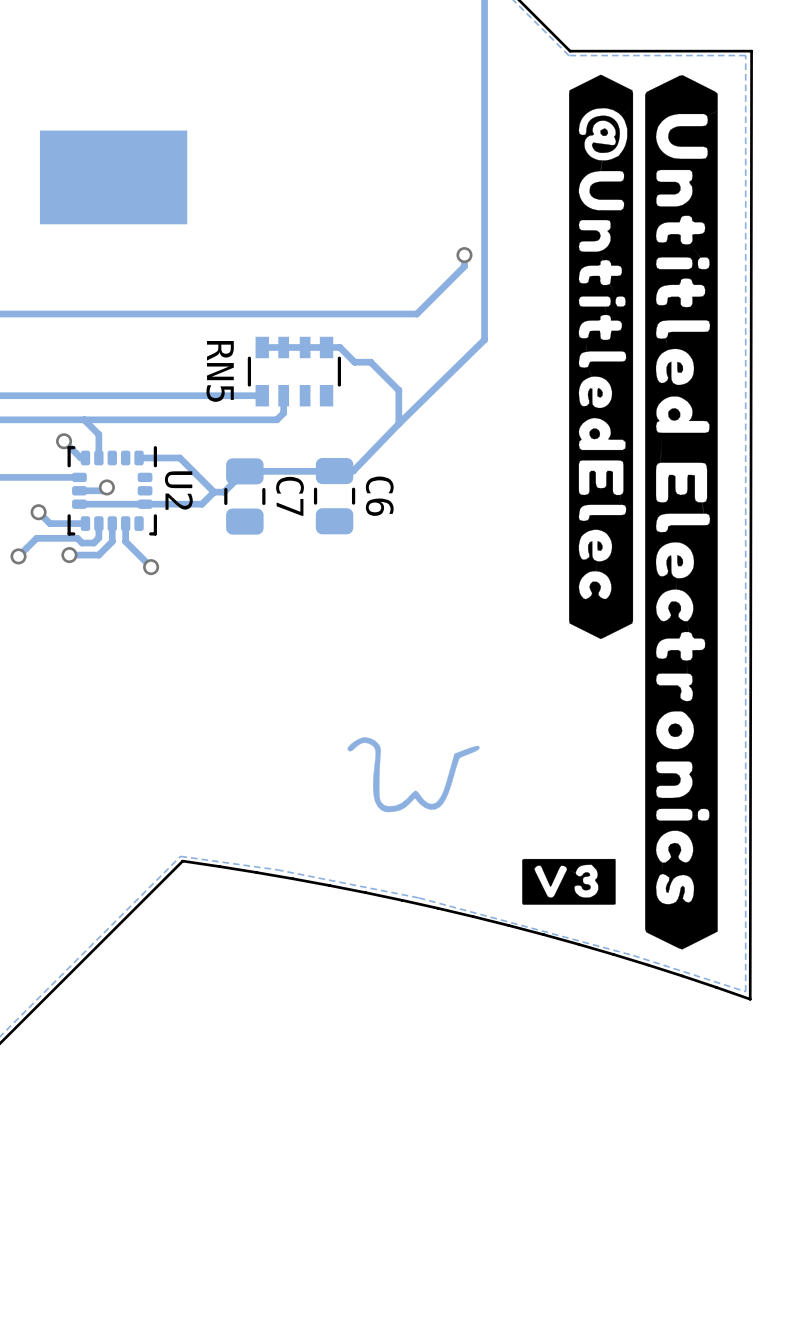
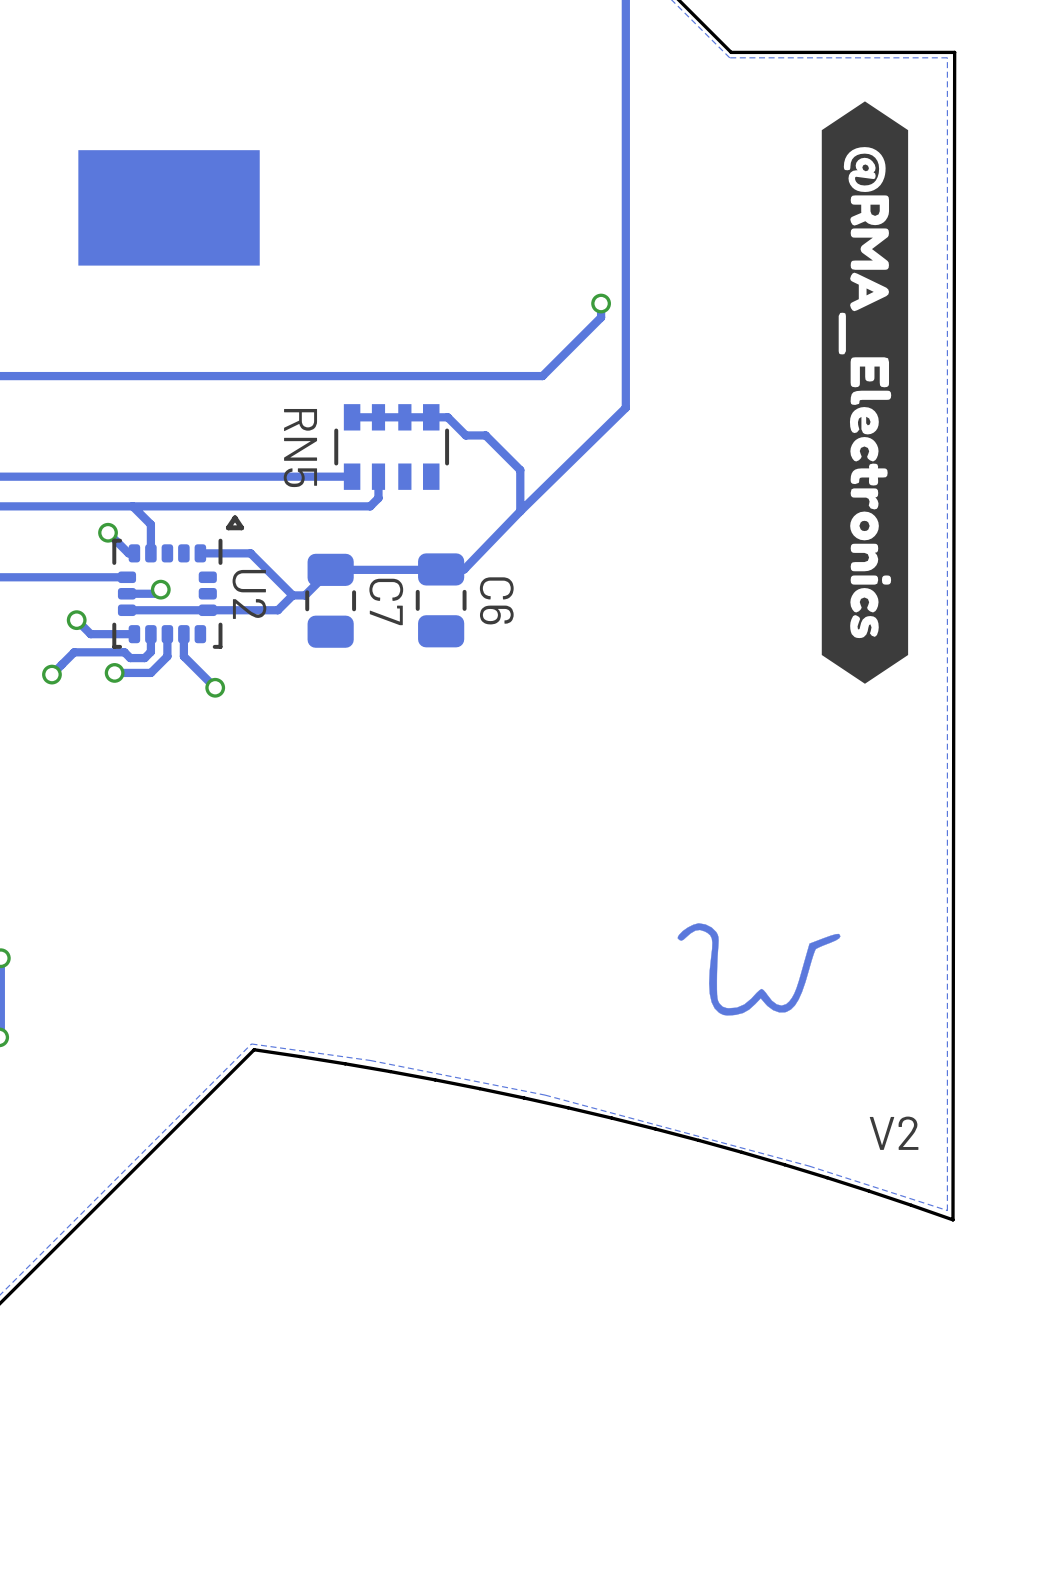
drawing: [522, 74, 718, 950] -> none
drawing: none -> [821, 101, 909, 684]
line: none -> (235, 517) (241, 527) (228, 527) (235, 517)
drawing position: (413, 774) -> (759, 969)
text: none -> V2 (894, 1133)

